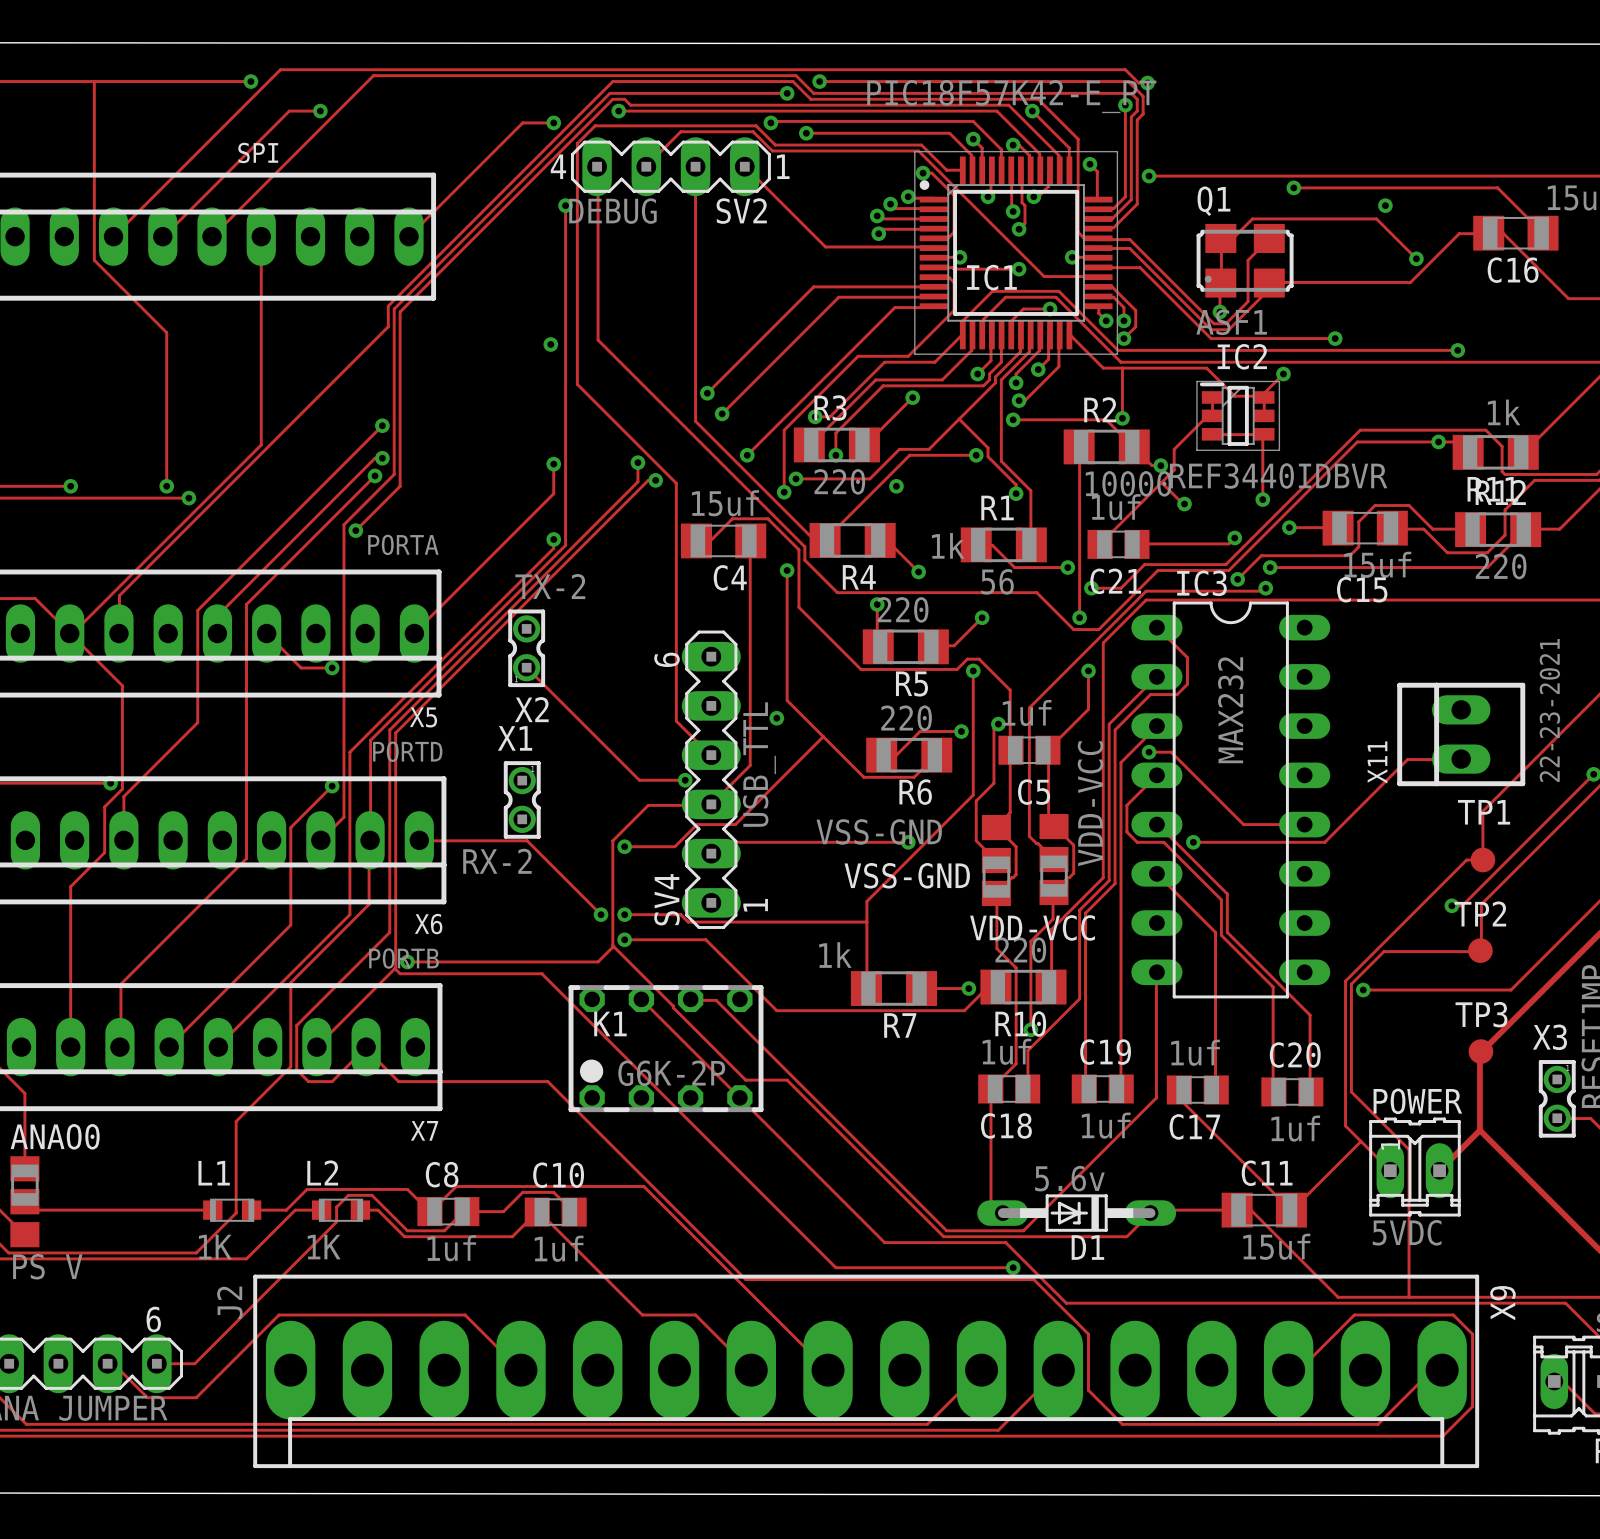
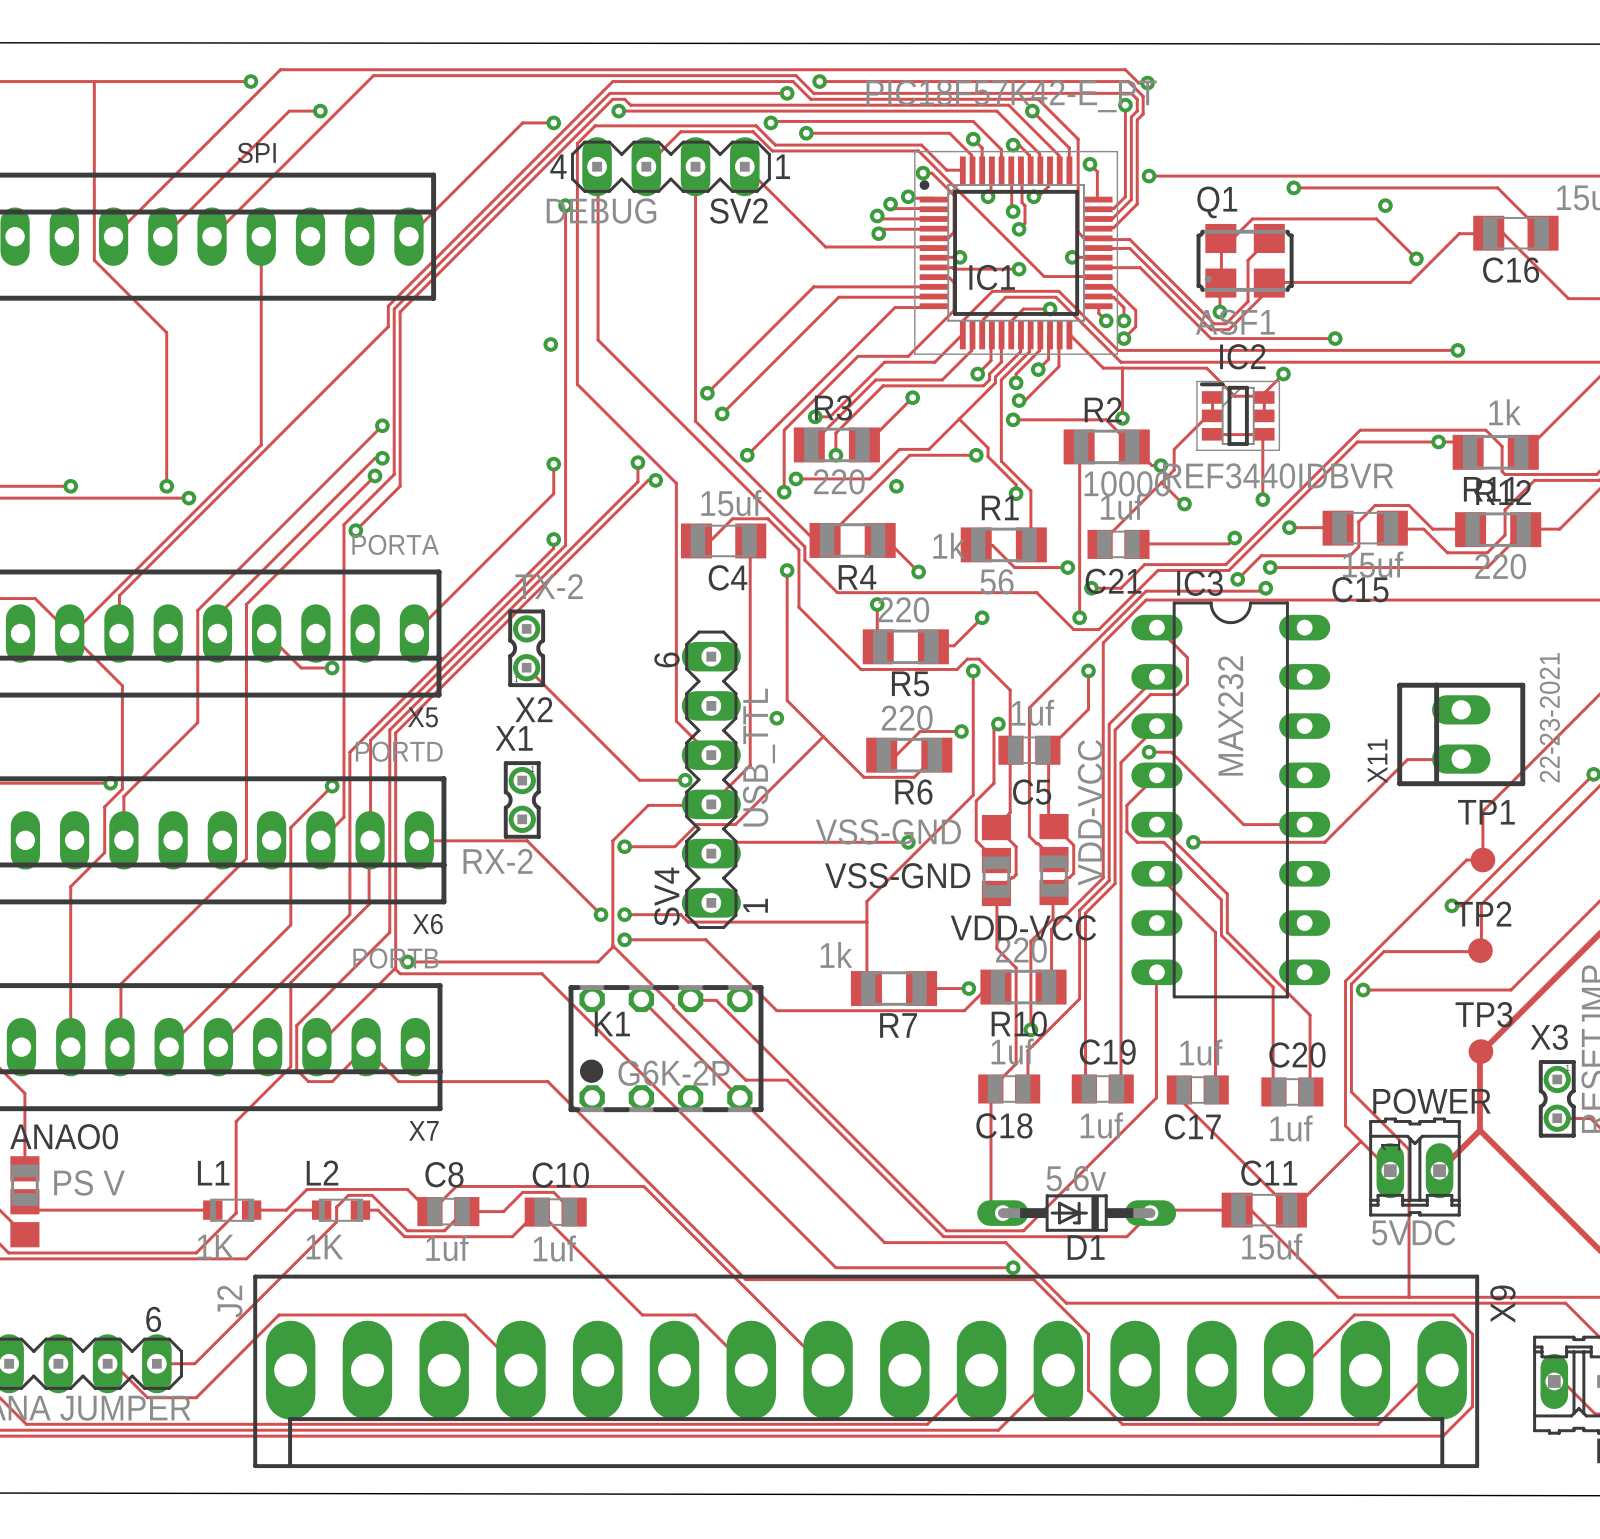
ANAO0 value position: PS V (47, 1266) -> PS V (89, 1183)

